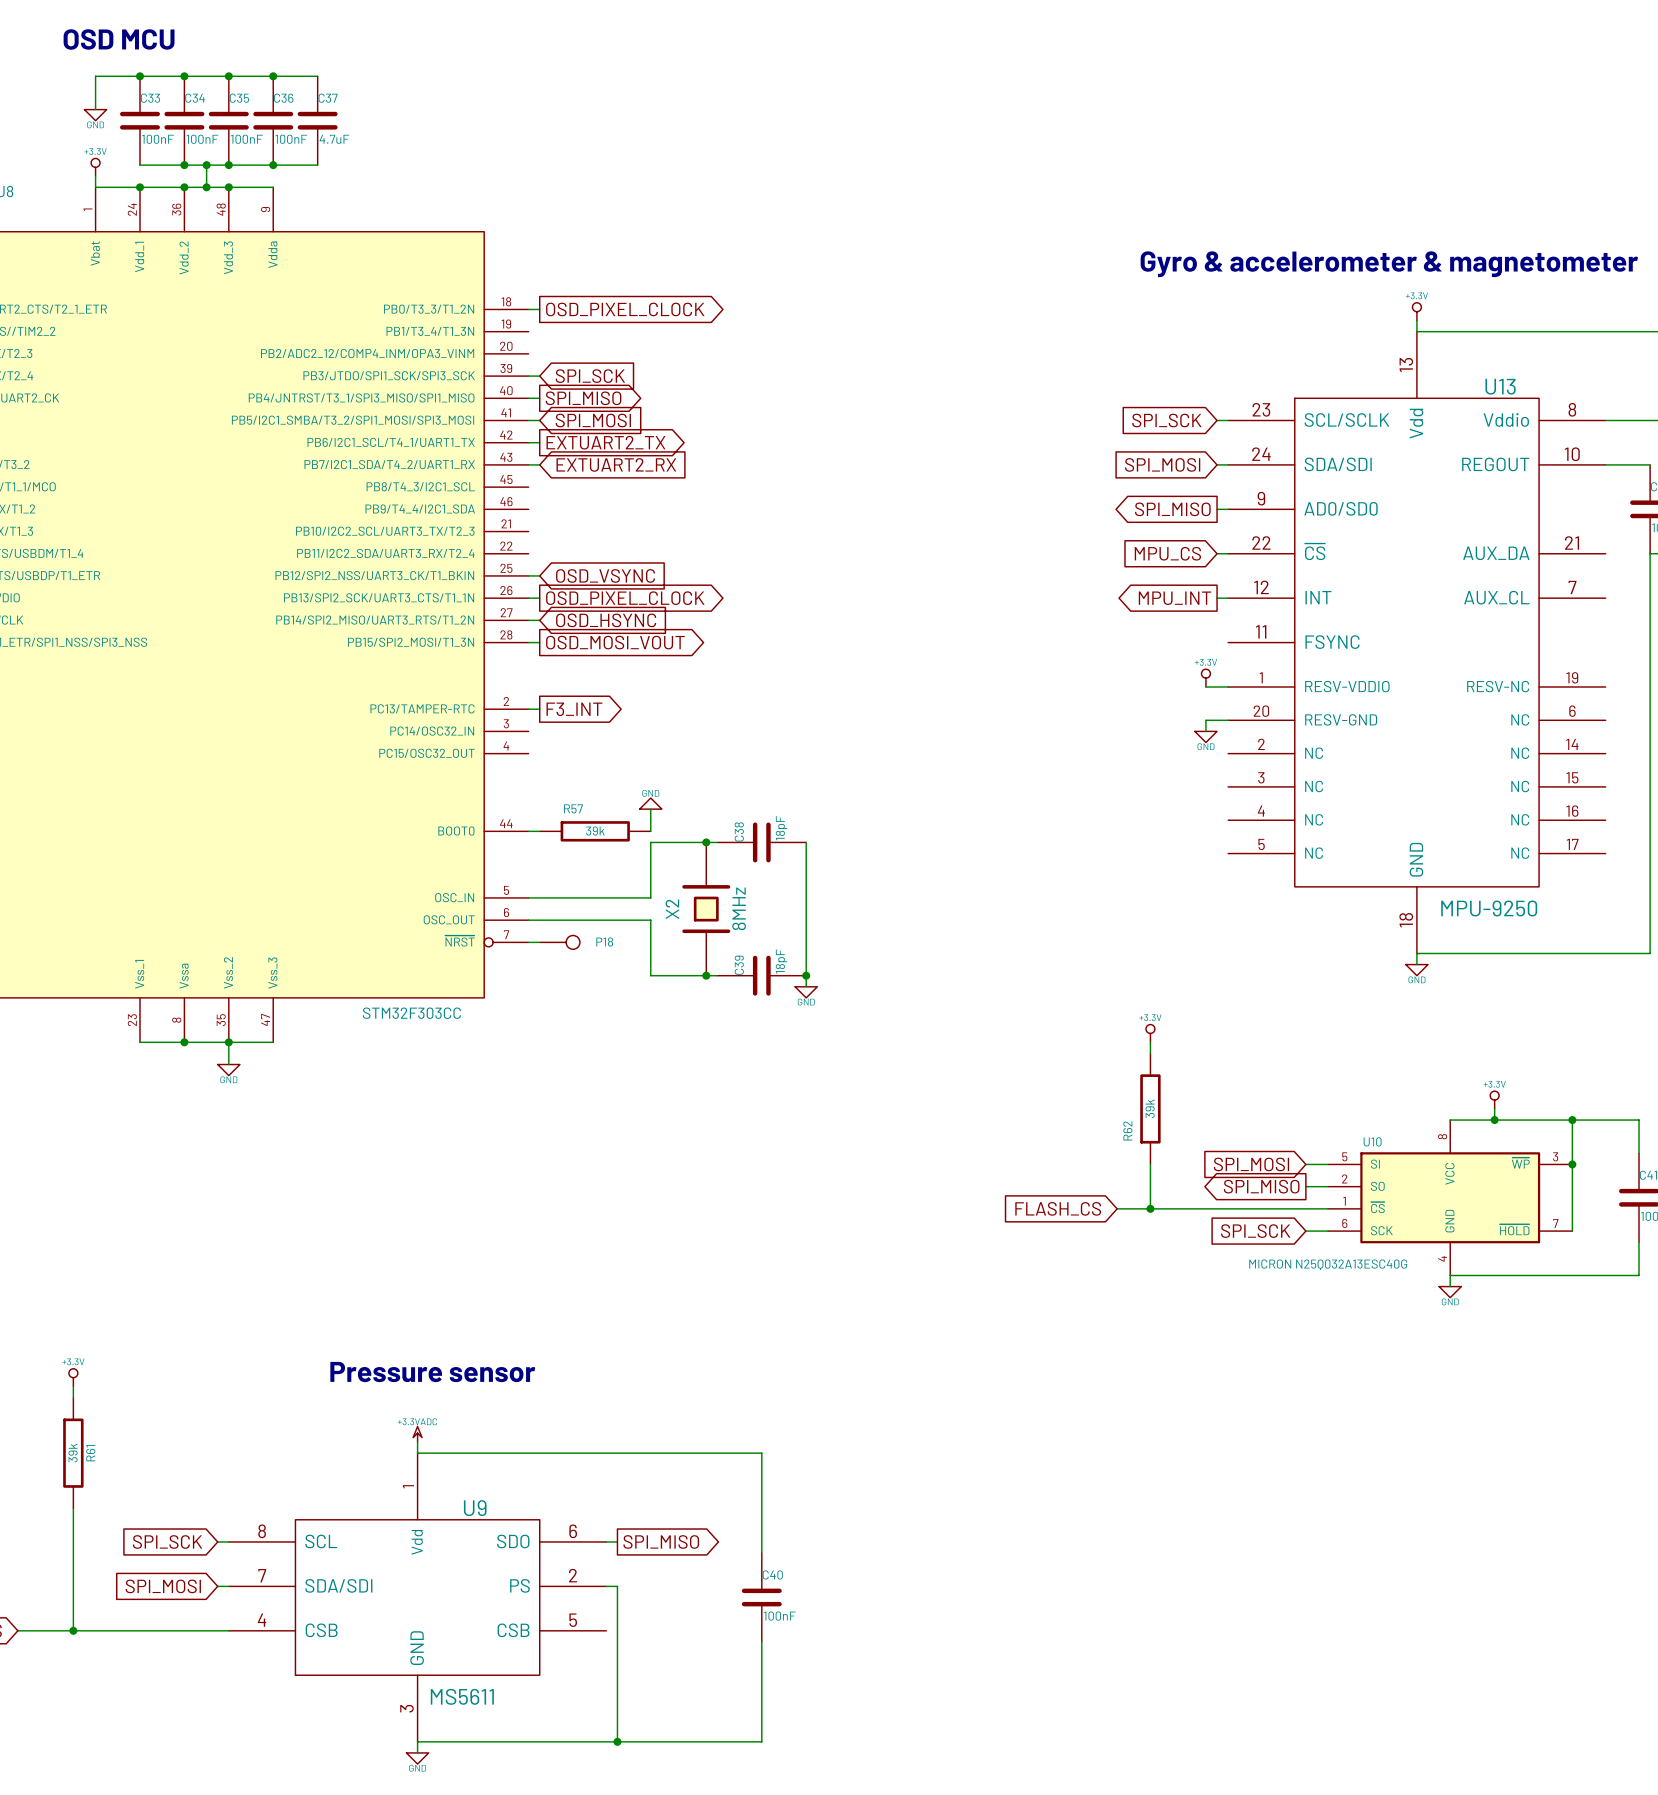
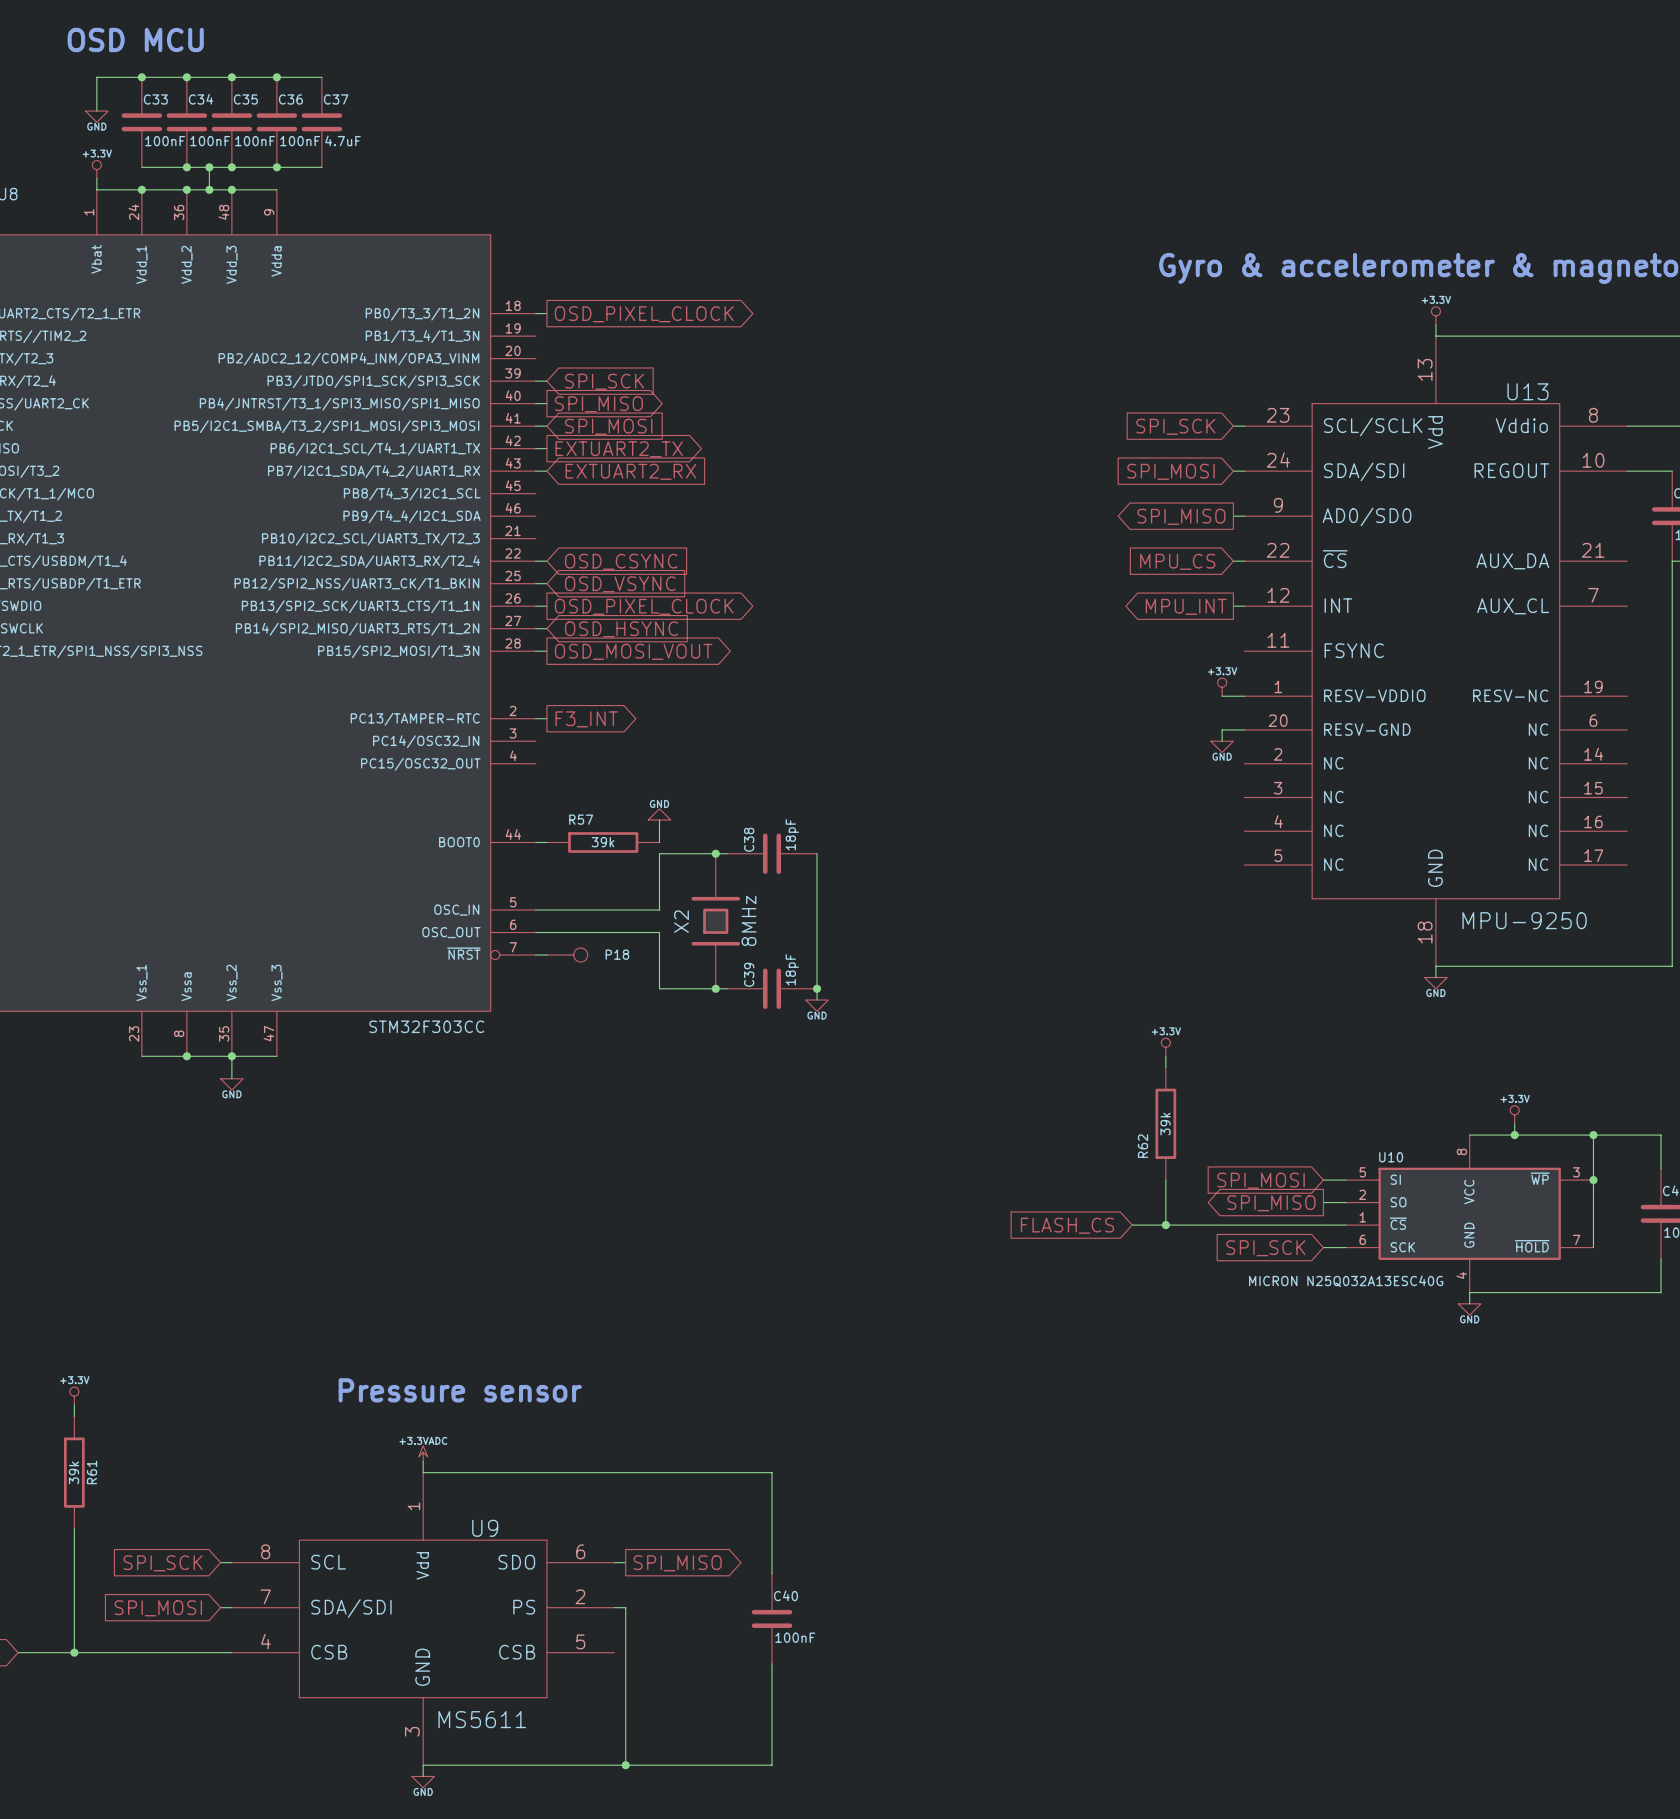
wire: none -> (535, 561) (546, 561)
global label: none -> OSD_CSYNC (621, 561)

